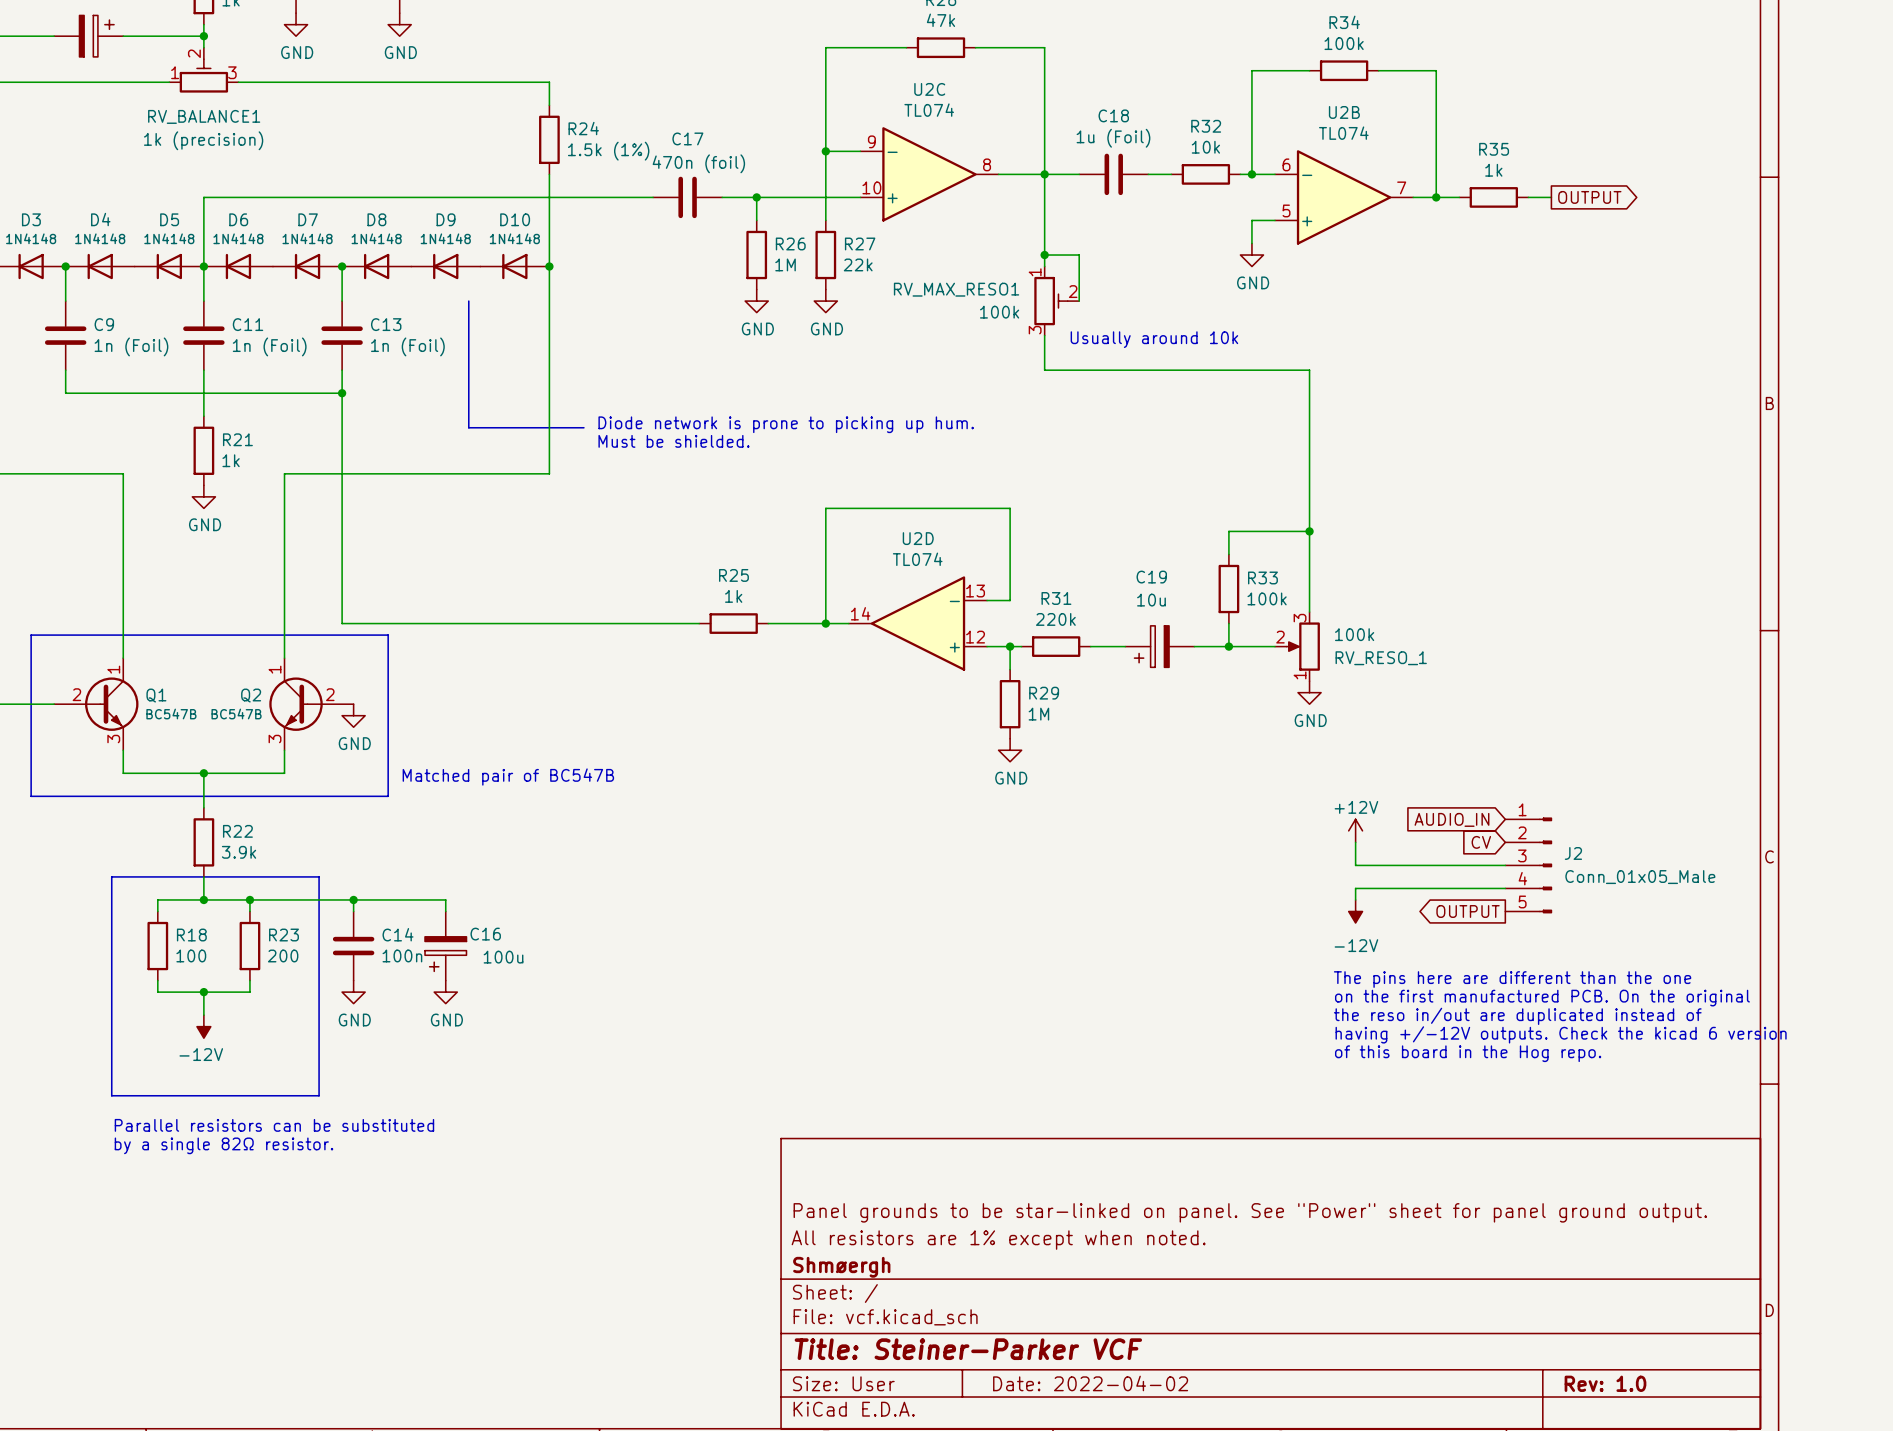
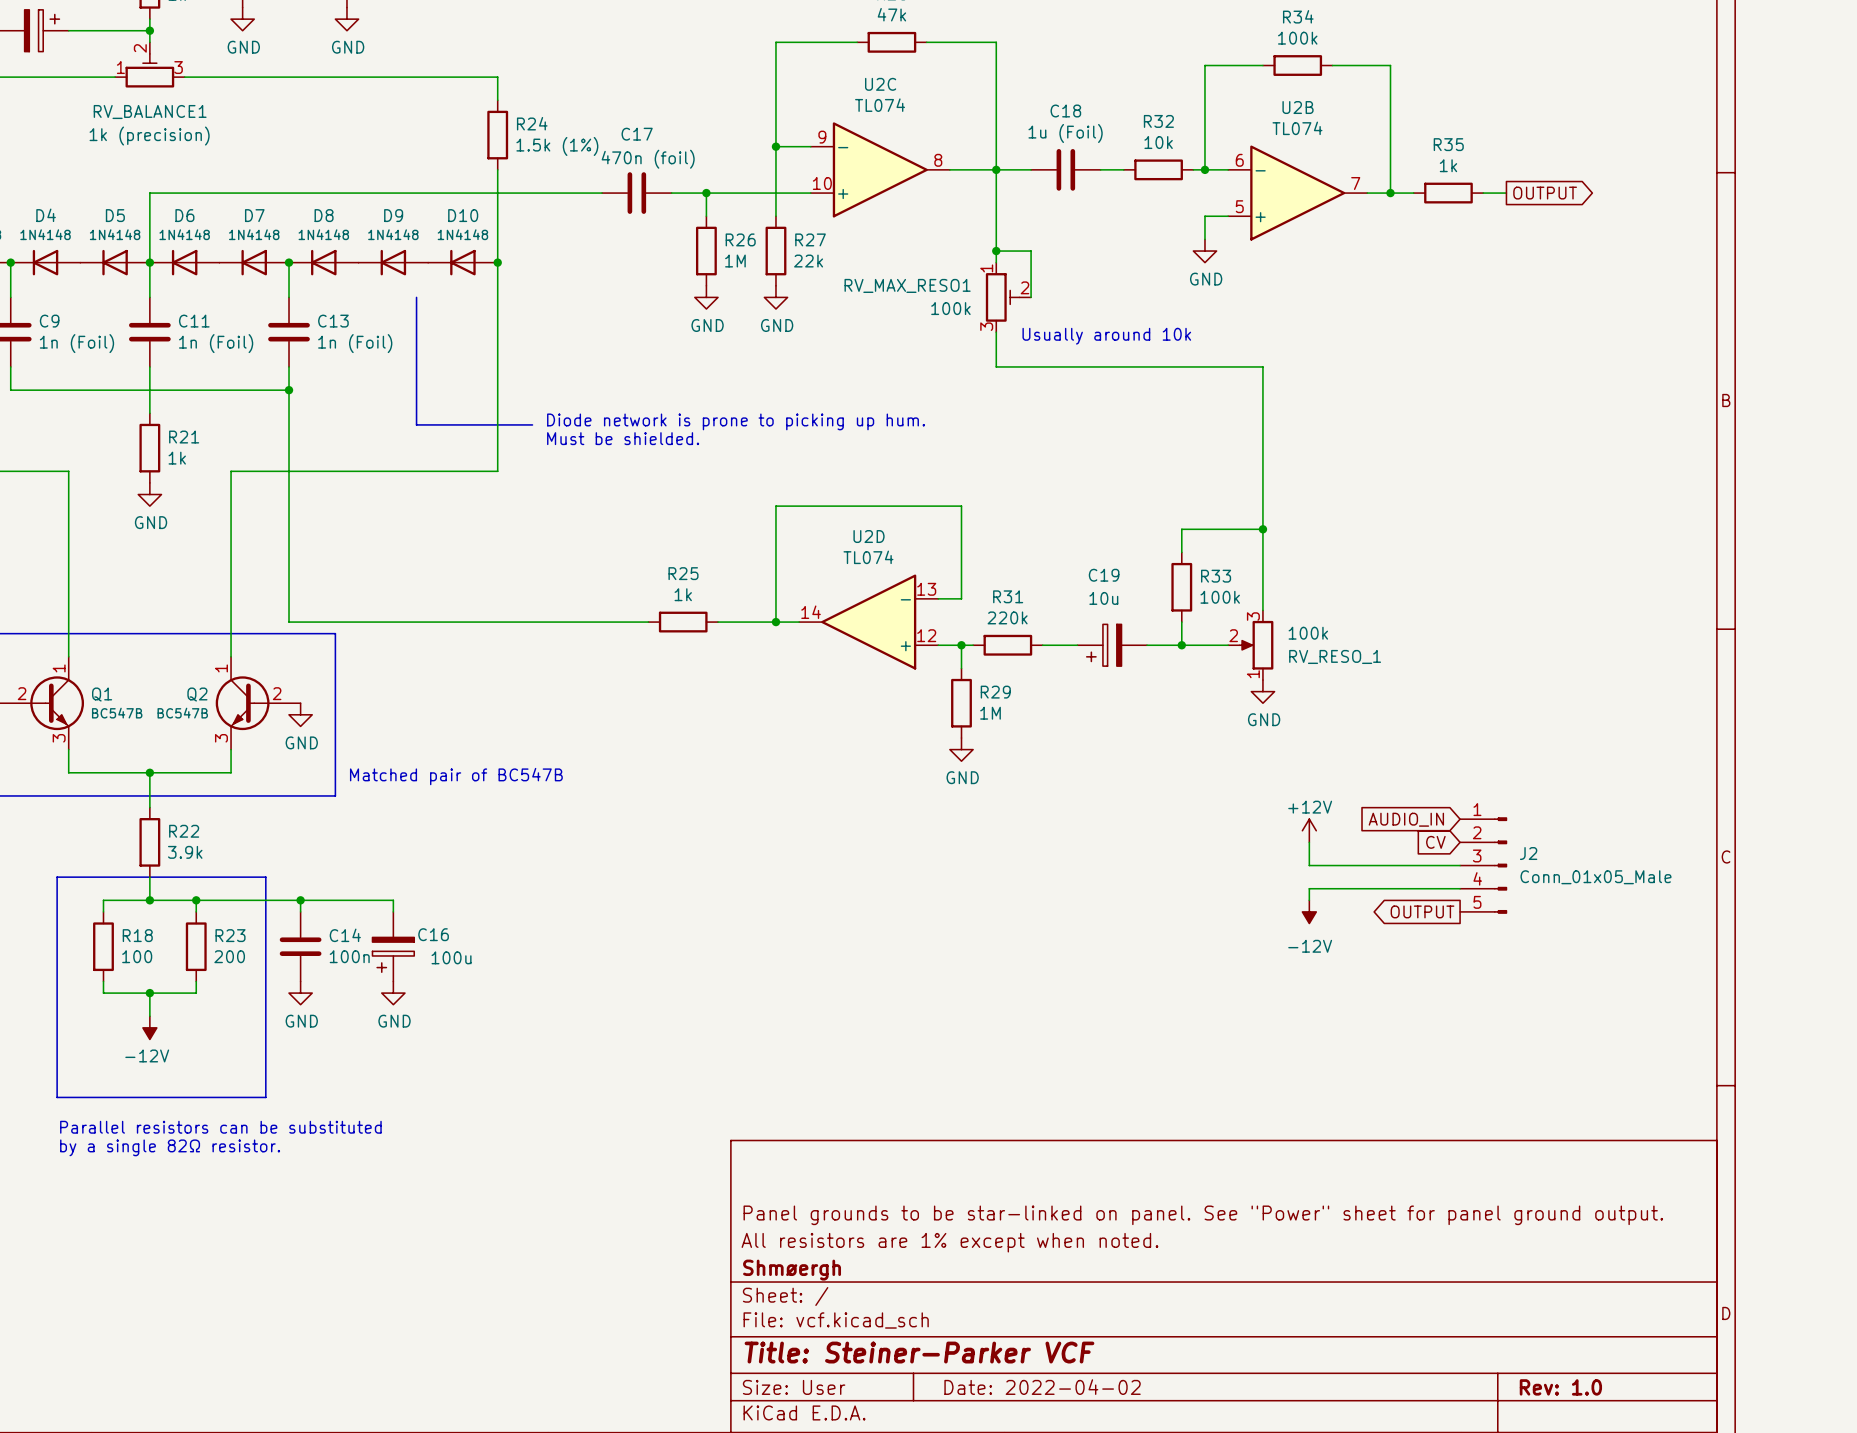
text: The pins here are different than the one (1512, 979) -> none
text: on the first manufactured PCB. On the original (1542, 998) -> none
text: the reso in/out are duplicated instead of (1517, 1016) -> none
text: having +/-12V outputs. Check the kicad 6 version (1561, 1034) -> none
text: of this board in the Hog repo. (1468, 1053) -> none

